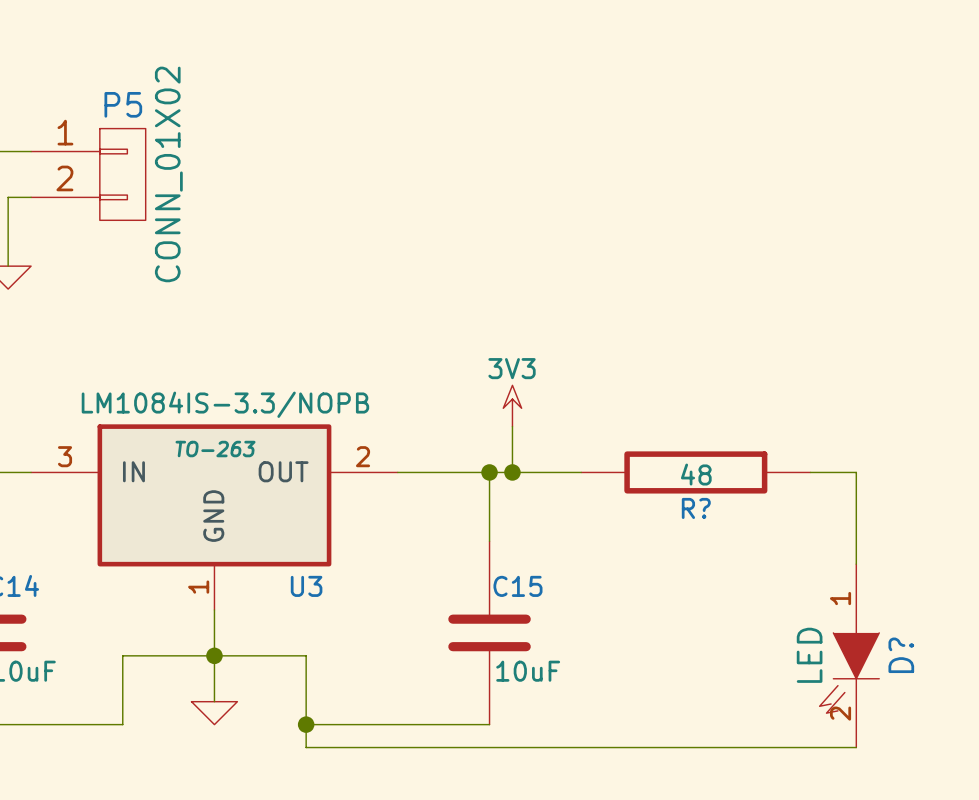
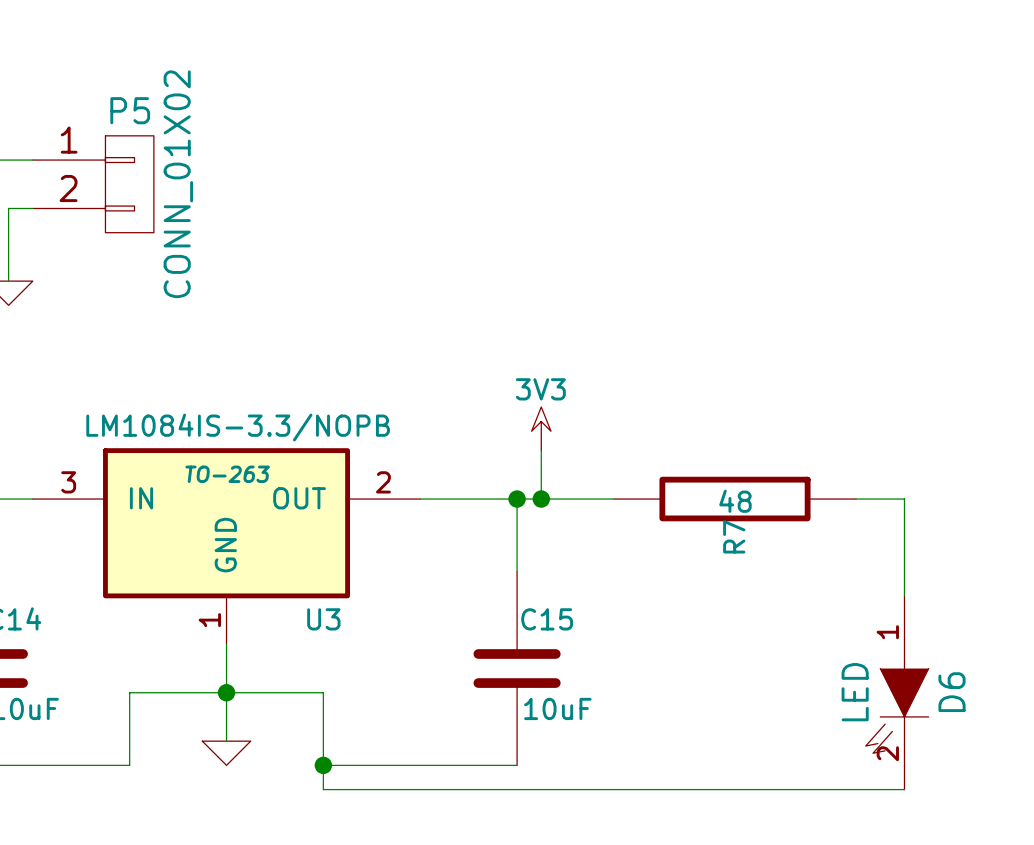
R? name: R? (696, 508) -> R7 (734, 536)
D? name: D? (901, 655) -> D6 (952, 692)

